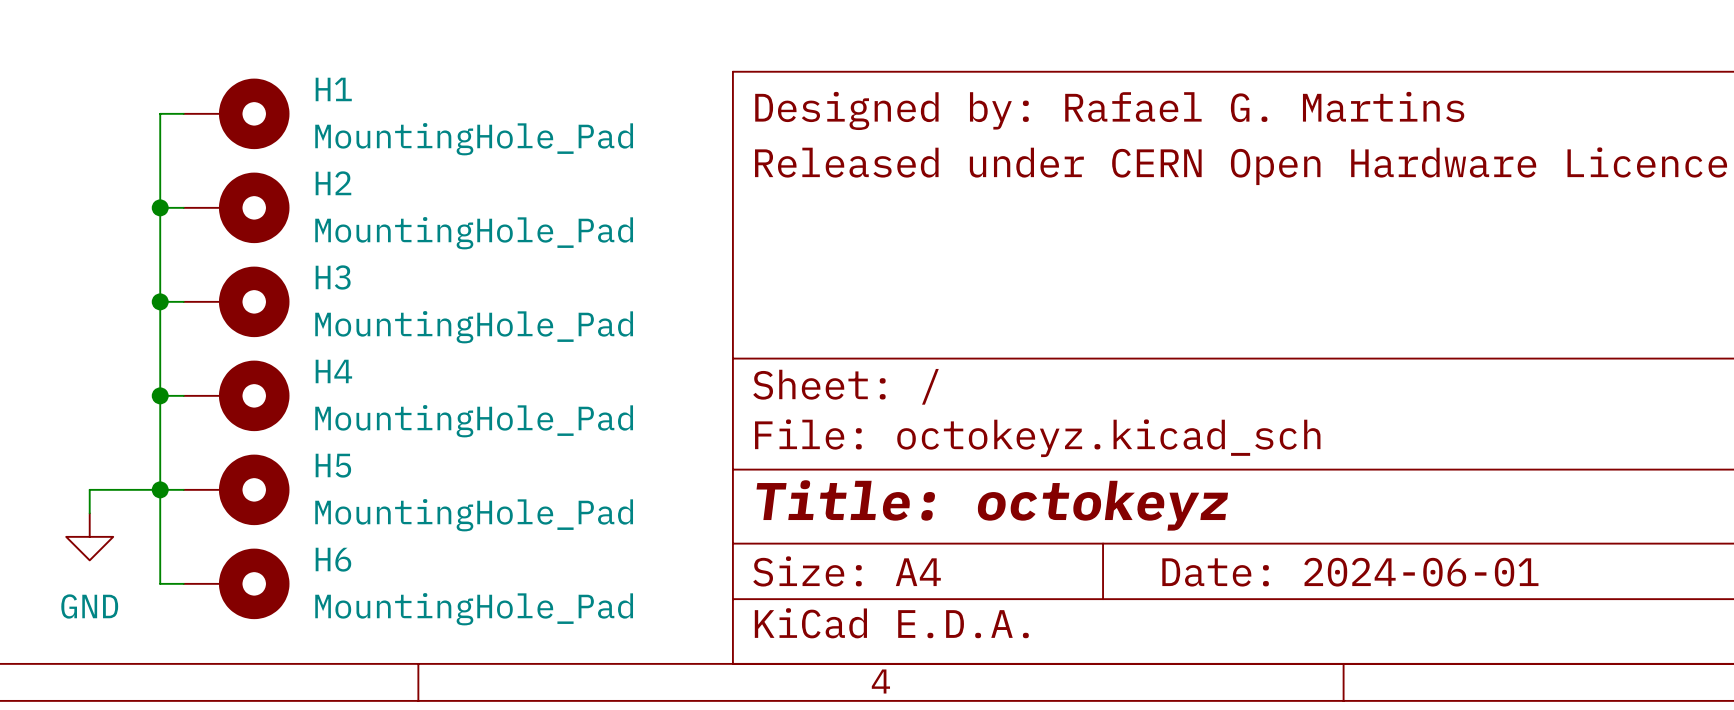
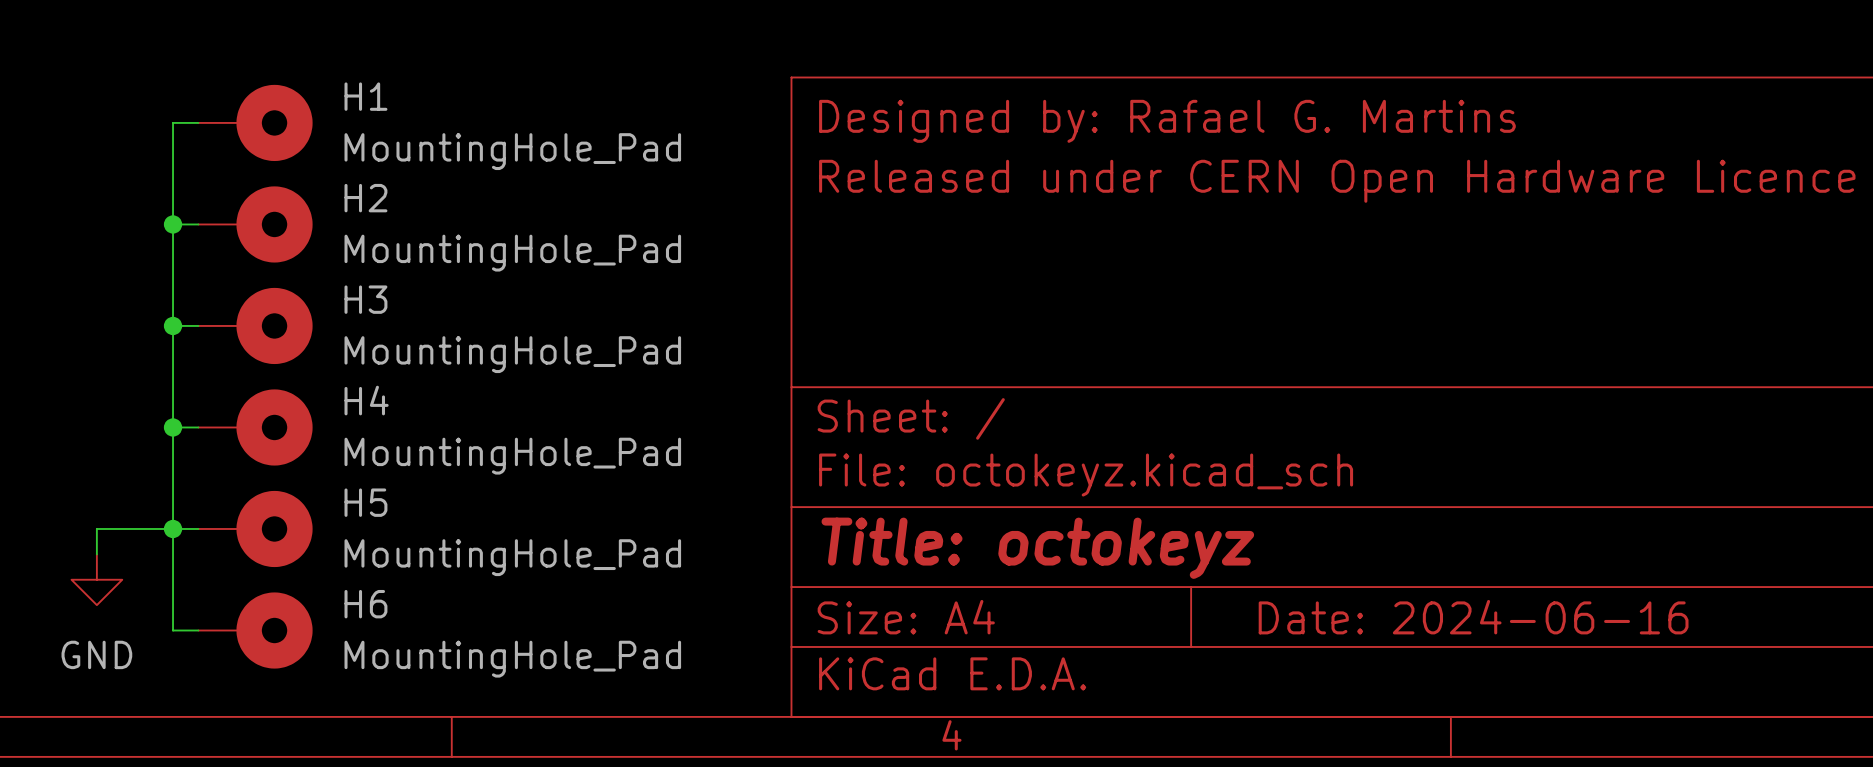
title block: Date: 2024-06-01 (1350, 572) -> Date: 2024-06-16 (1473, 617)

